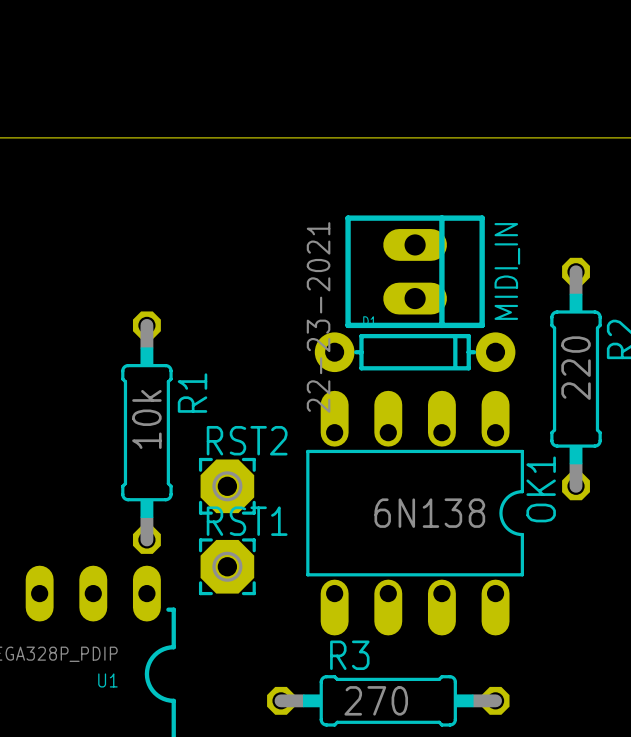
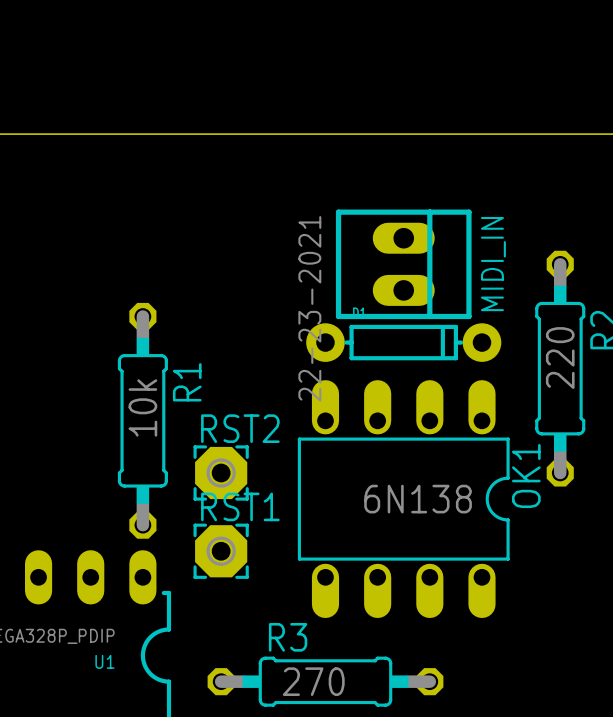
R3 position: (388, 700) -> (325, 681)

